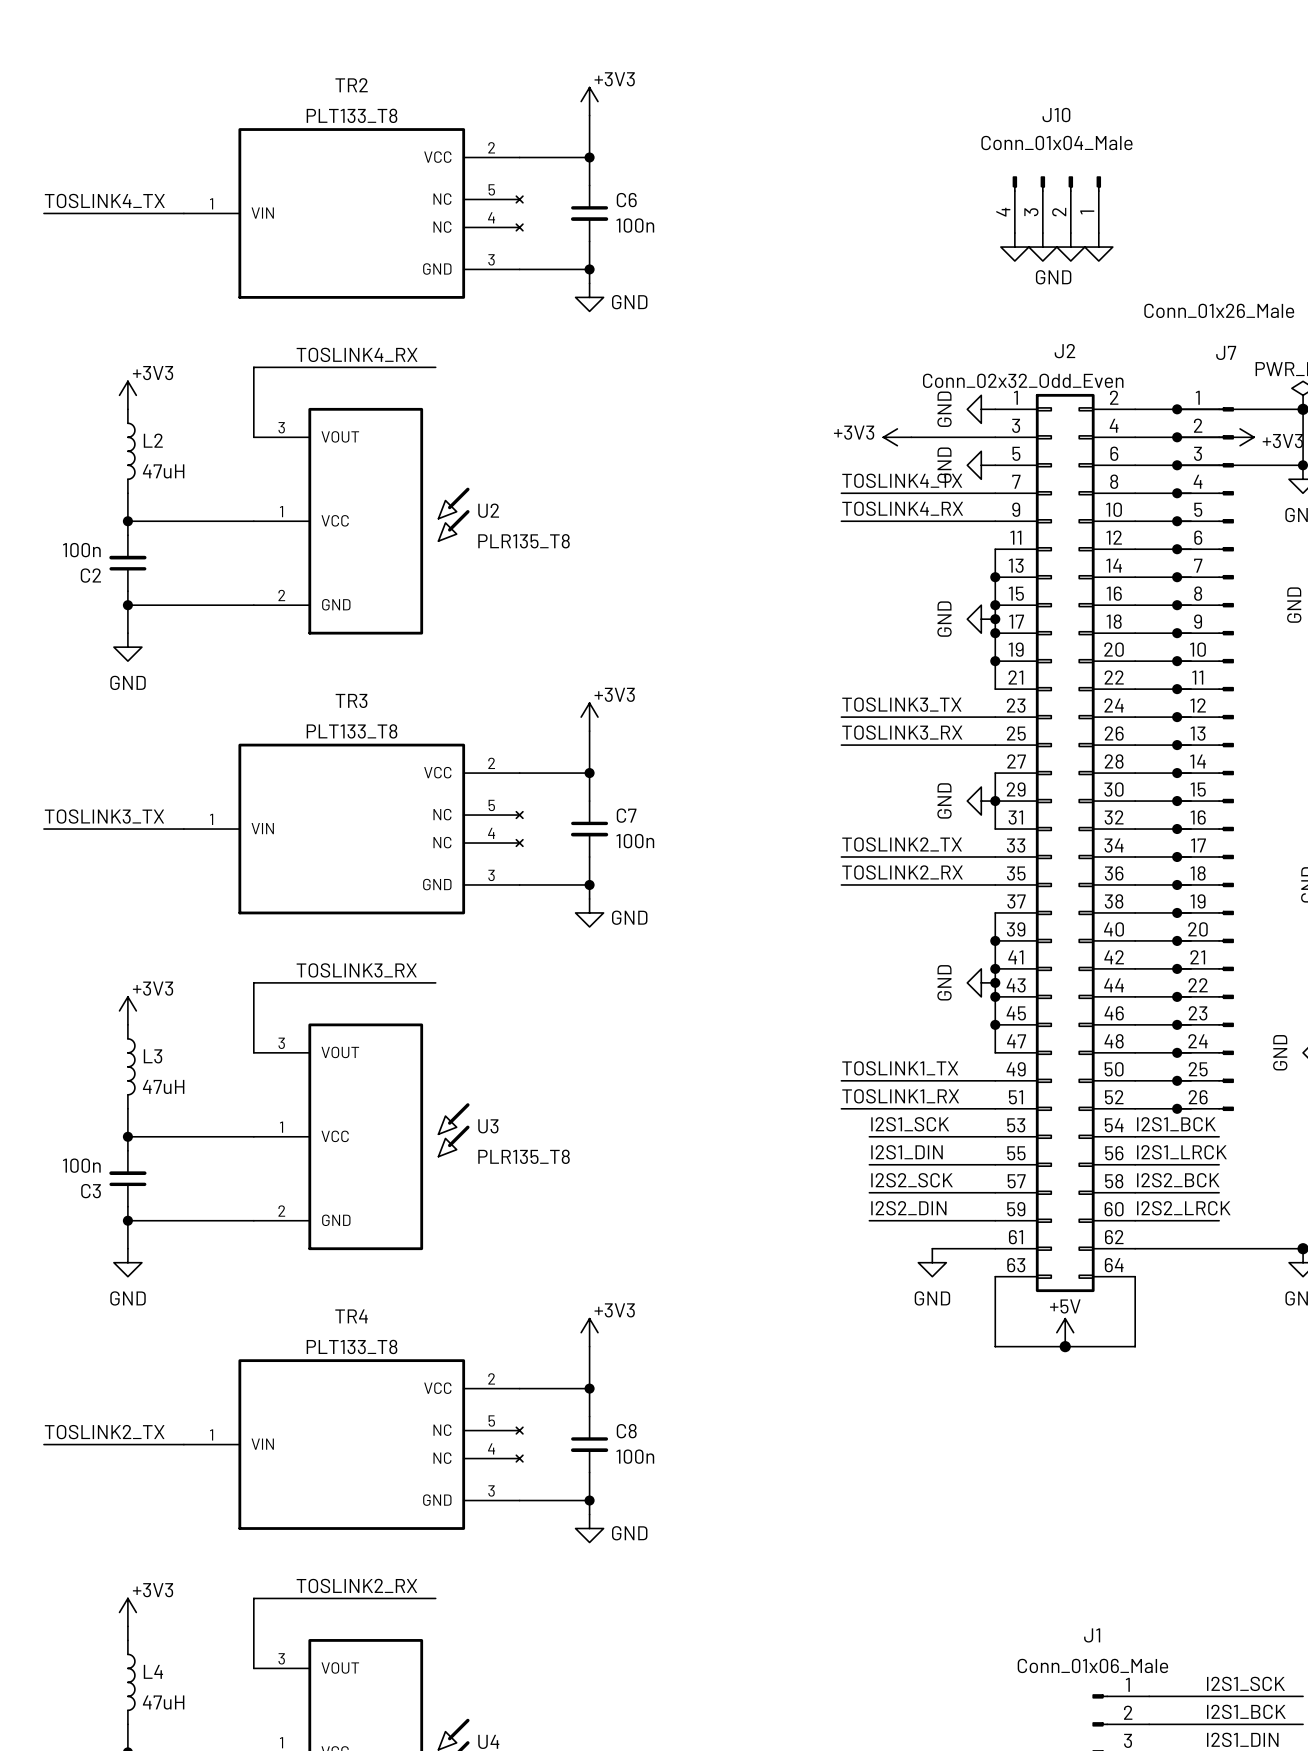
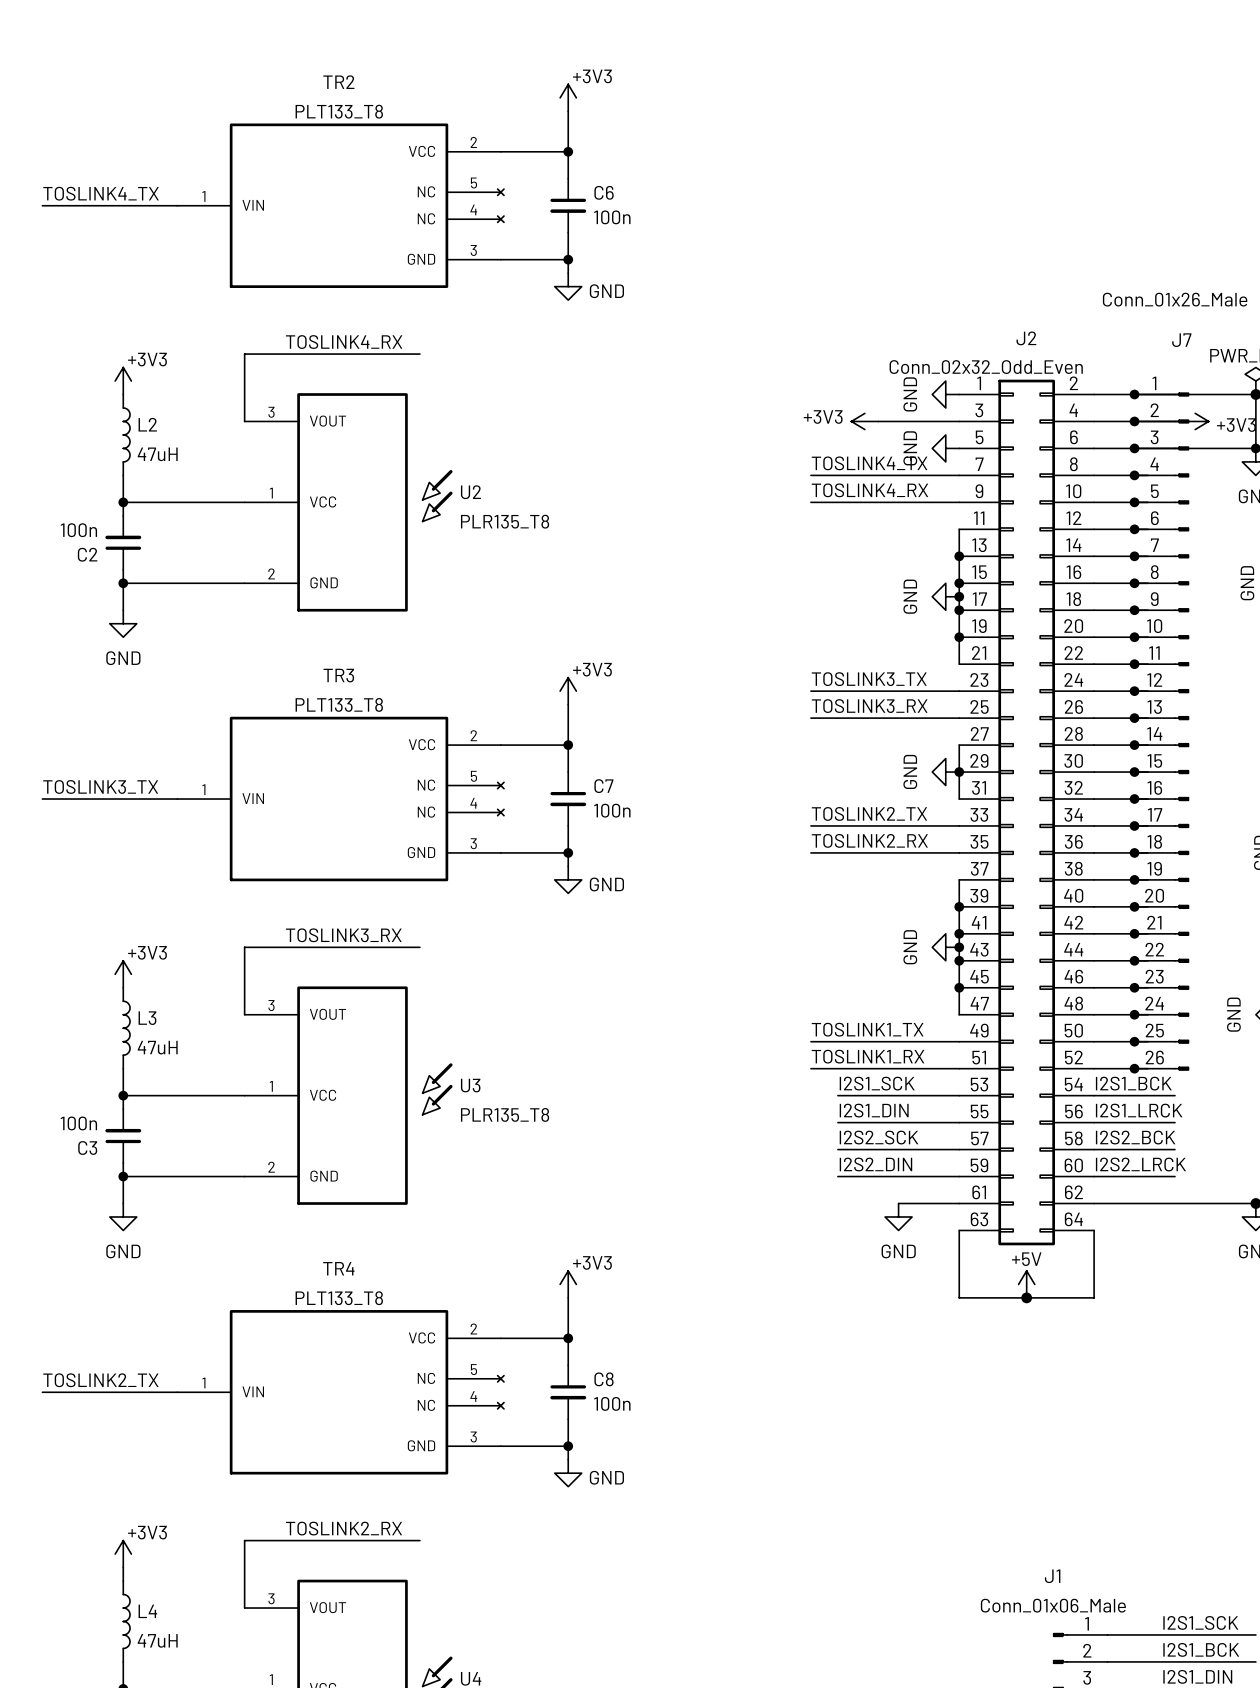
J10: Conn_01x04_Male (1056, 204) -> none
power symbol: (1014, 247) -> none
power symbol: GND (1042, 247) -> none
power symbol: (1070, 247) -> none
power symbol: (1098, 247) -> none

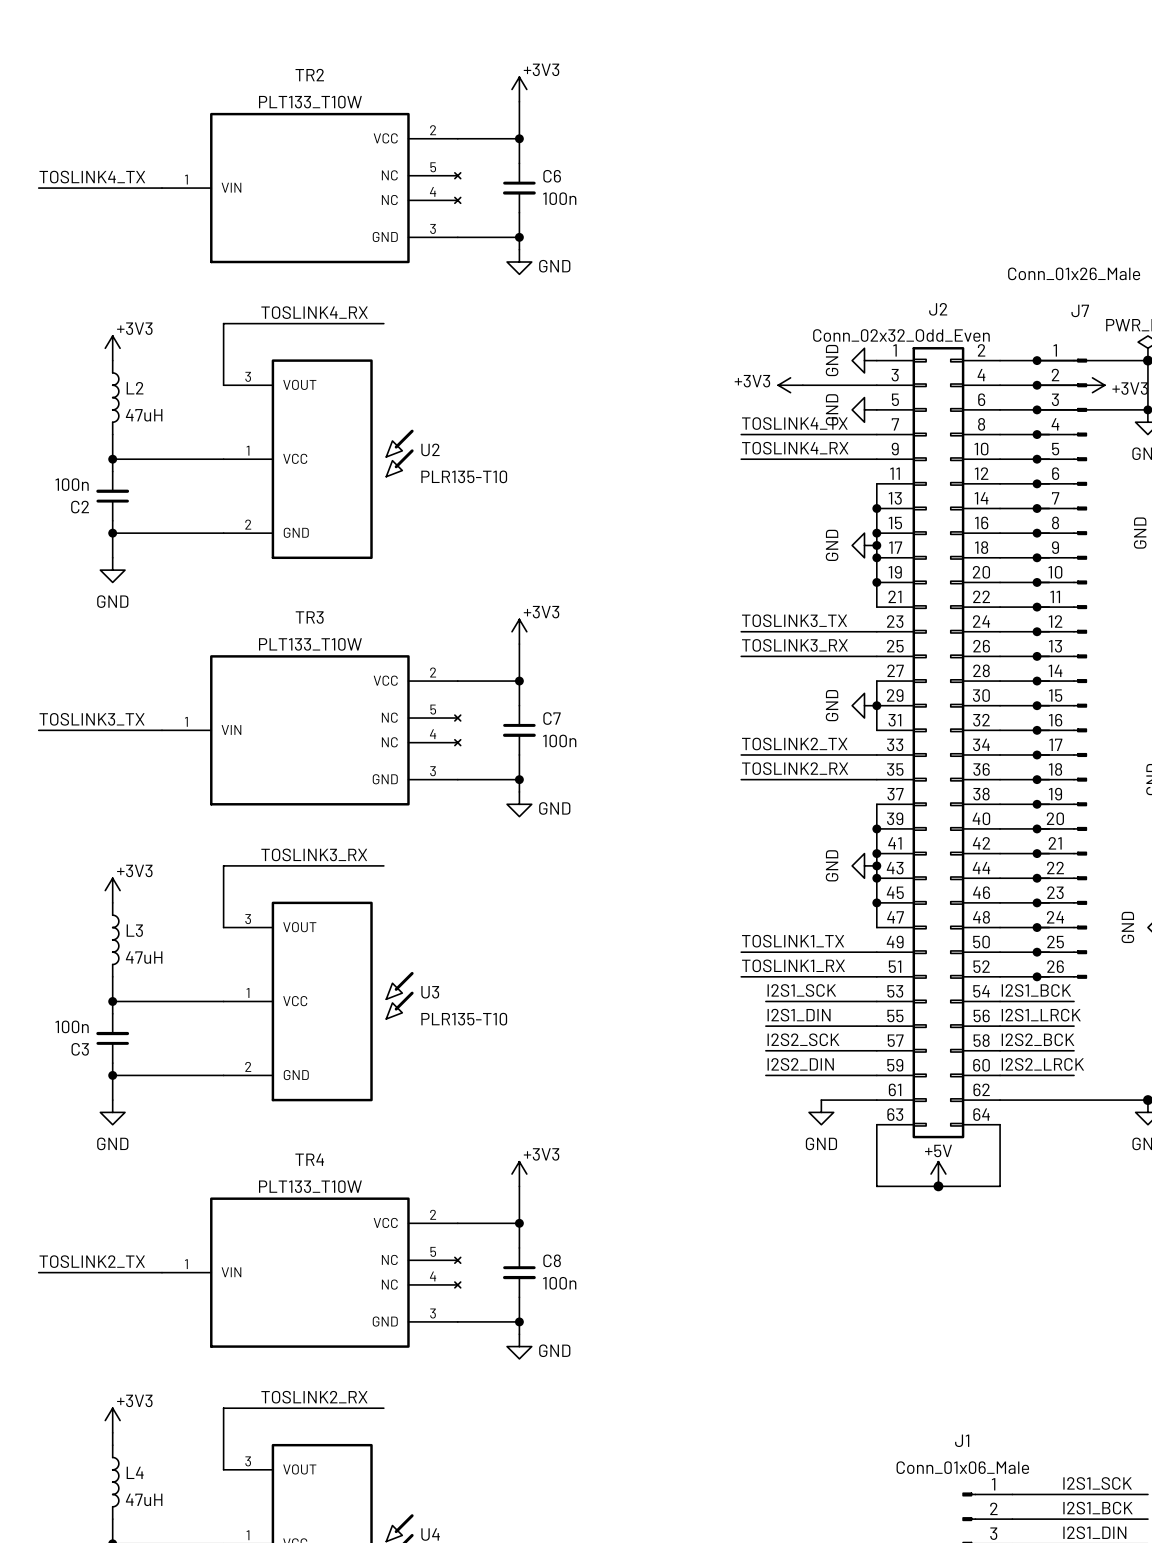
TR2 value: PLT133_T8 (339, 111) -> PLT133_T10W (310, 102)
U2 value: PLR135_T8 (505, 521) -> PLR135-T10 (464, 476)
TR3 value: PLT133_T8 (339, 704) -> PLT133_T10W (310, 644)
U3 value: PLR135_T8 (505, 1114) -> PLR135-T10 (464, 1019)
TR4 value: PLT133_T8 (339, 1298) -> PLT133_T10W (310, 1186)

